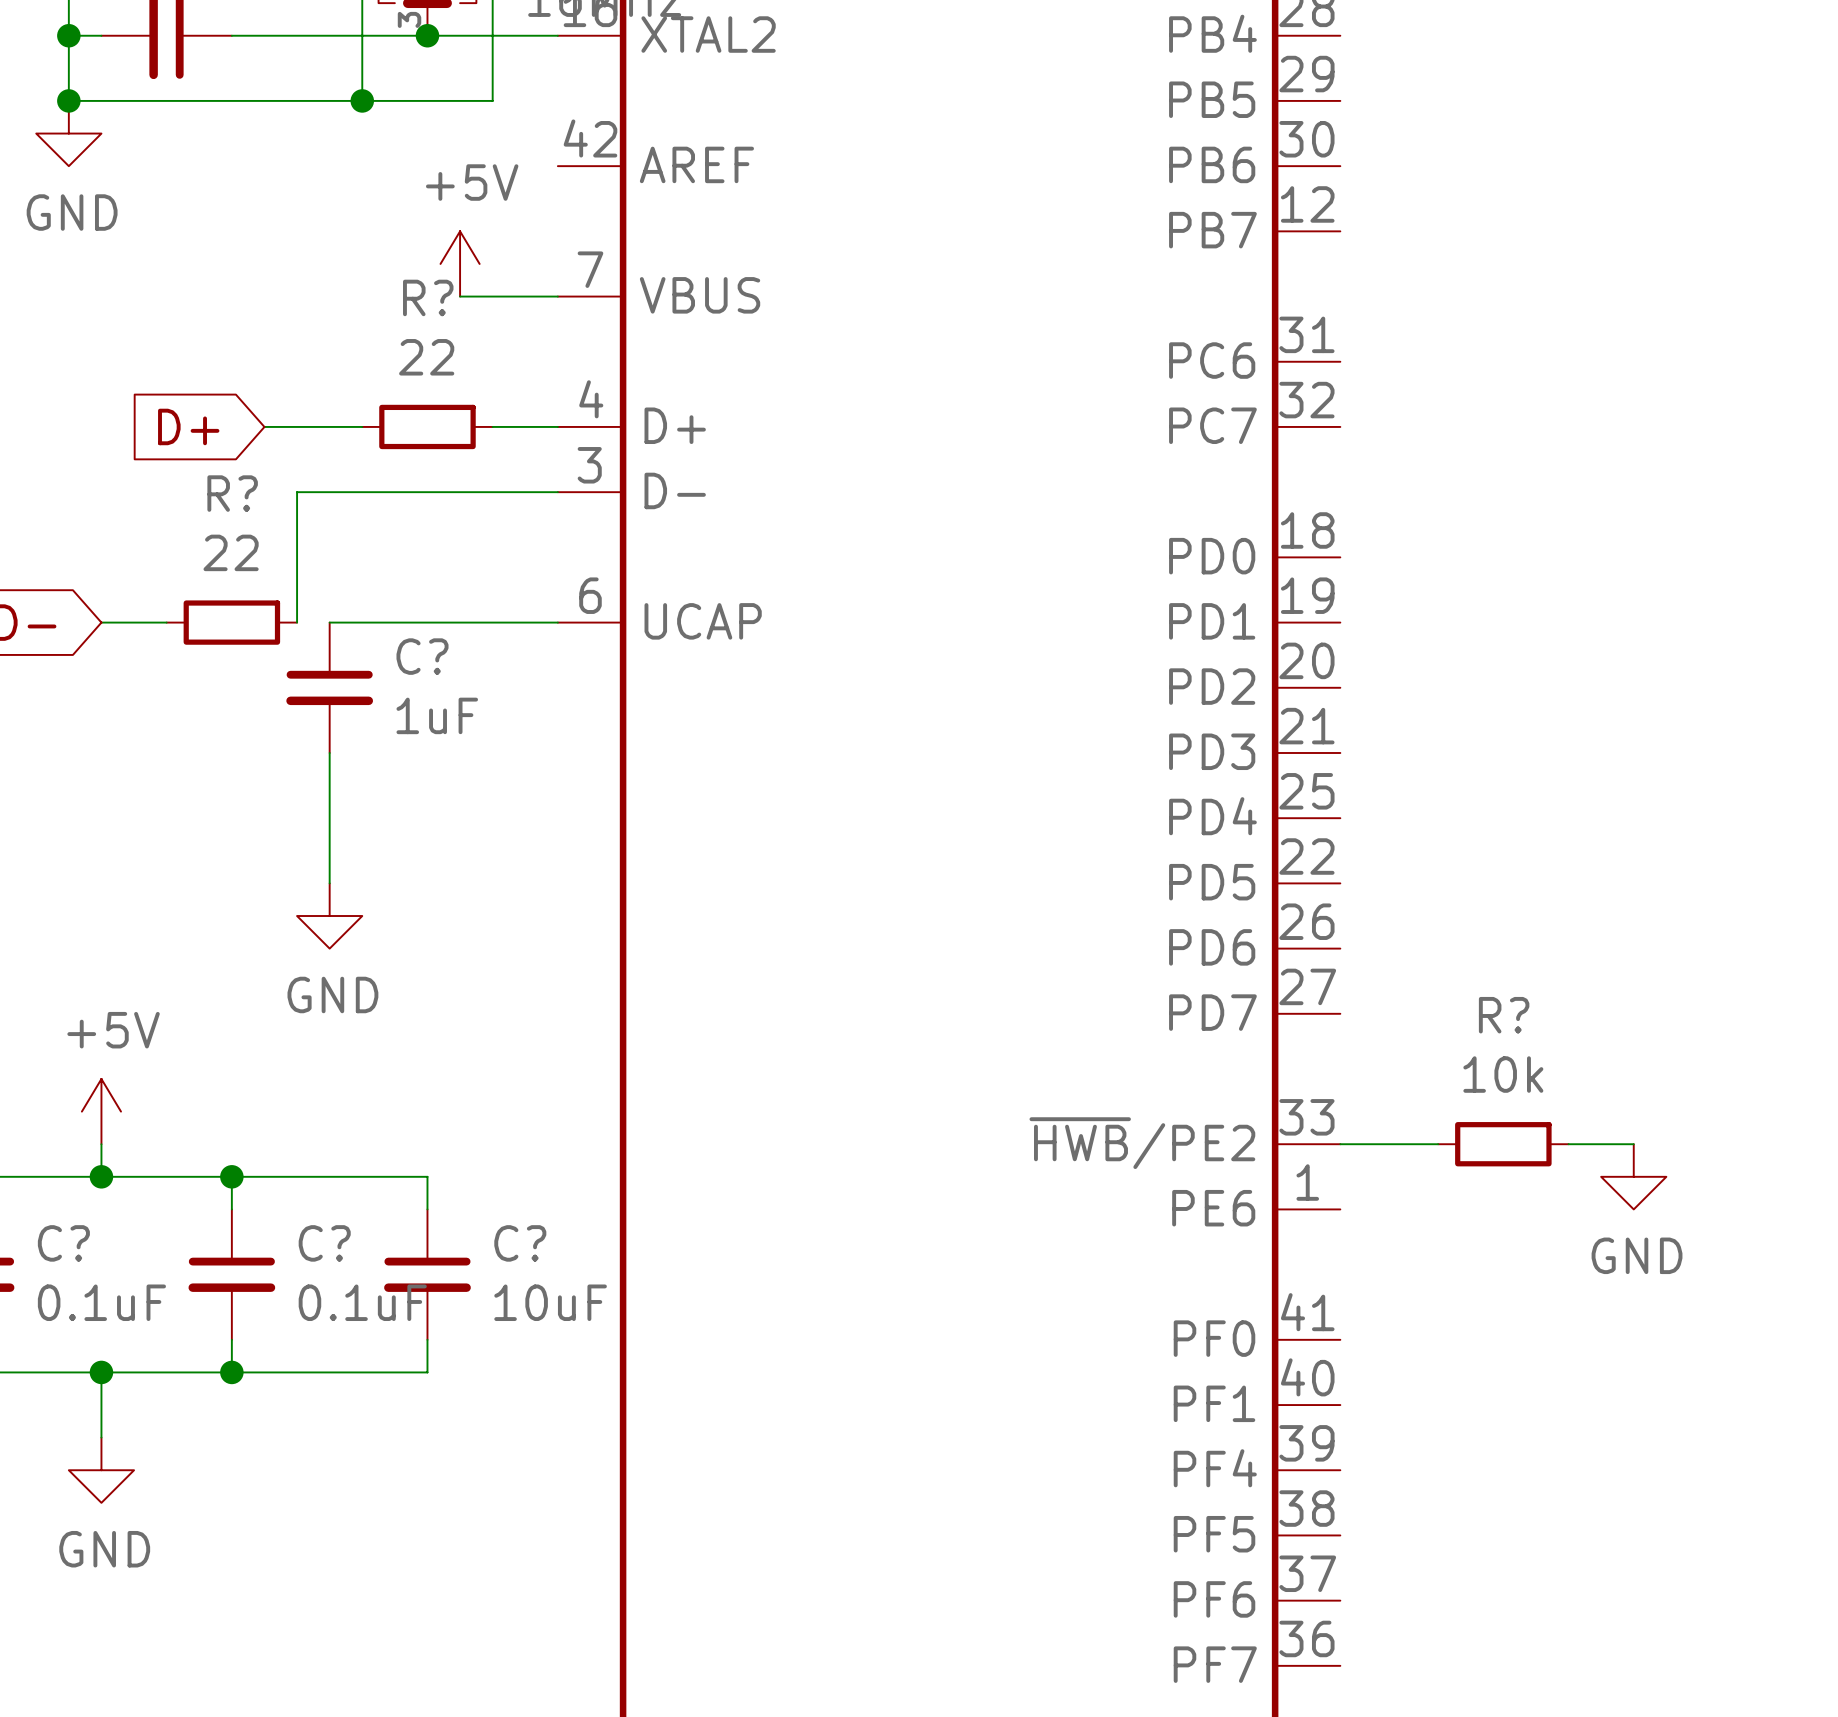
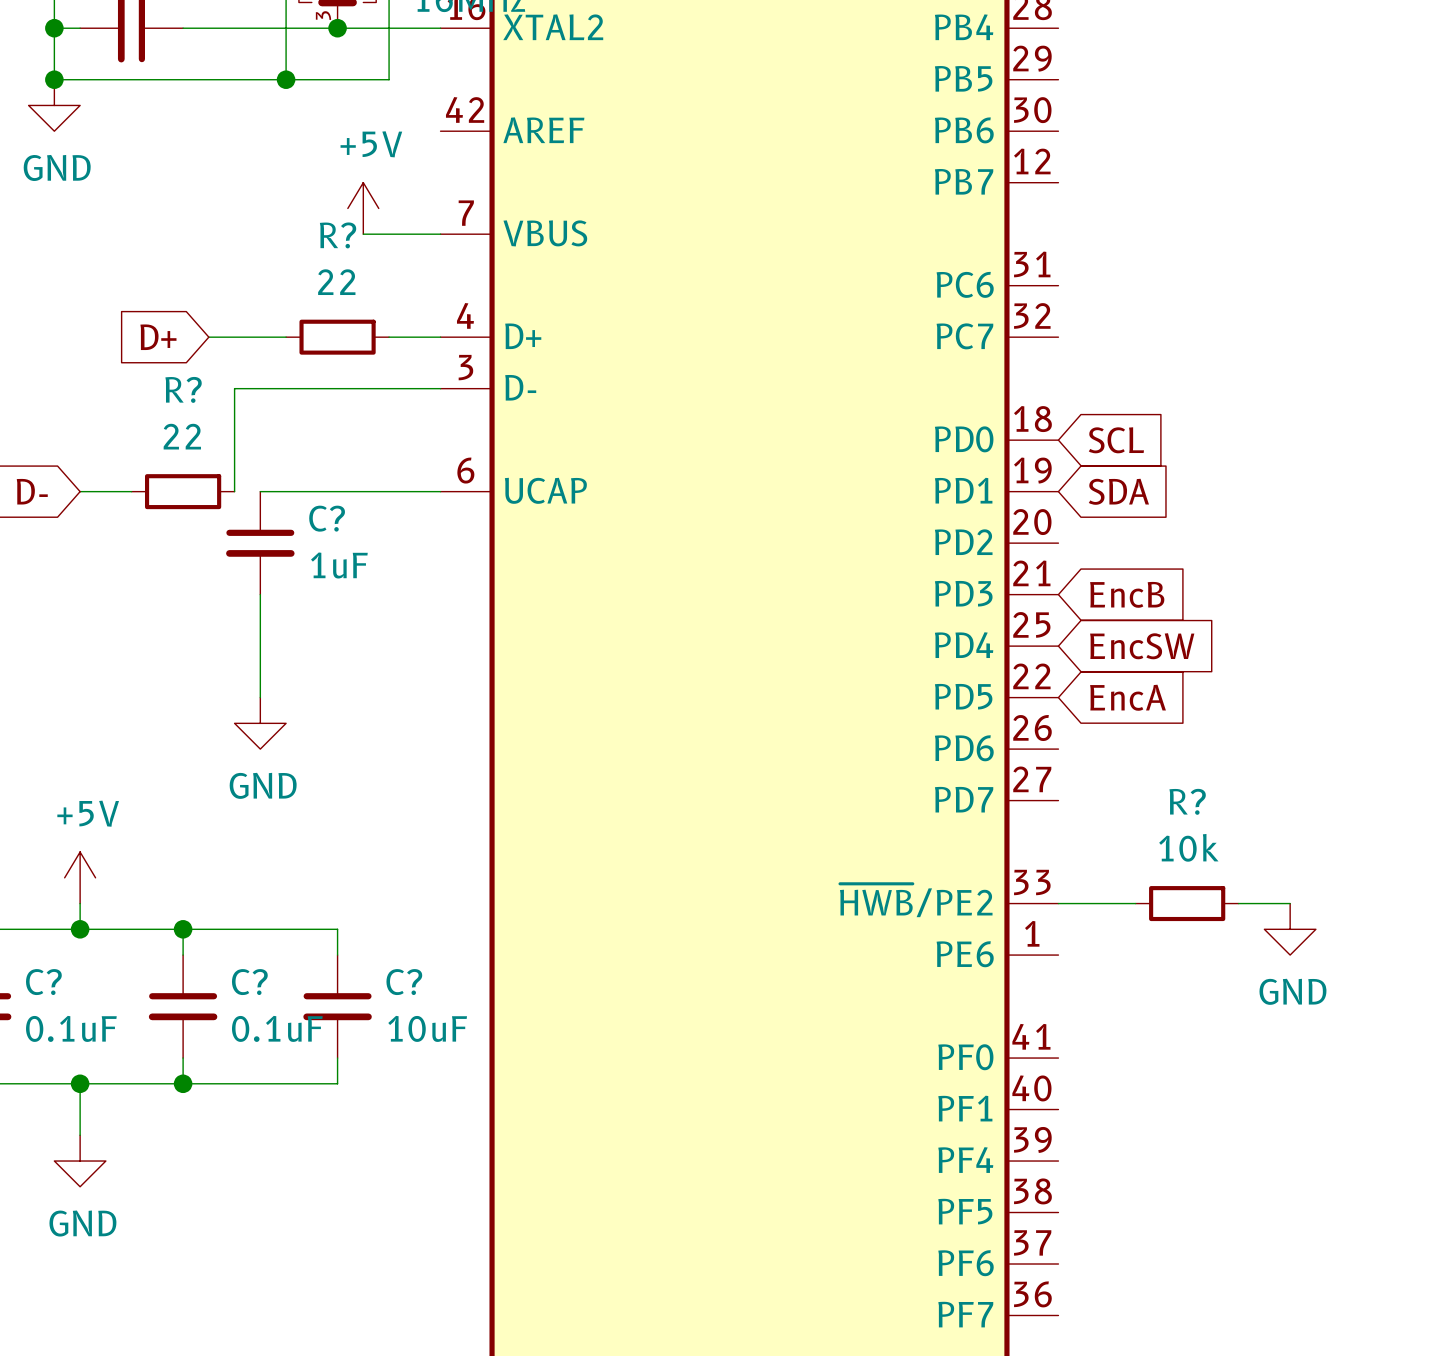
global label: none -> SCL (1116, 440)
global label: none -> SDA (1118, 491)
global label: none -> EncB (1127, 594)
global label: none -> EncSW (1142, 646)
global label: none -> EncA (1128, 697)

